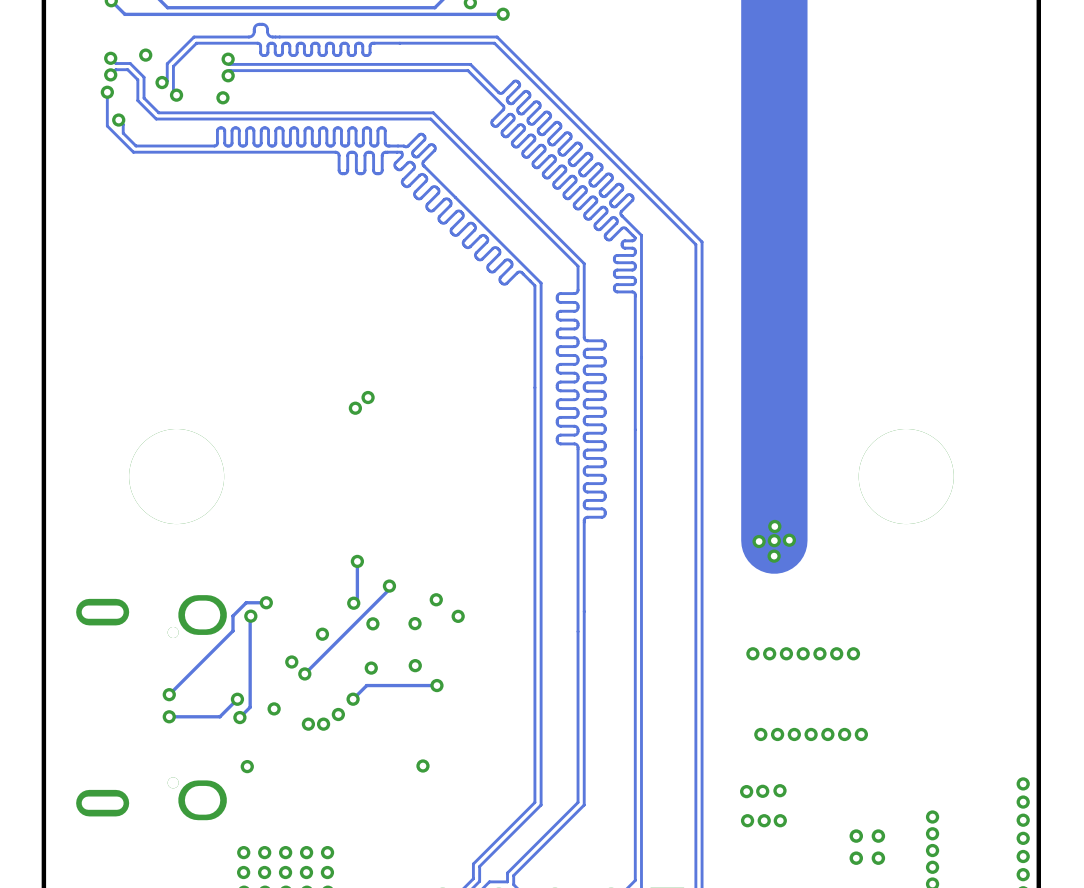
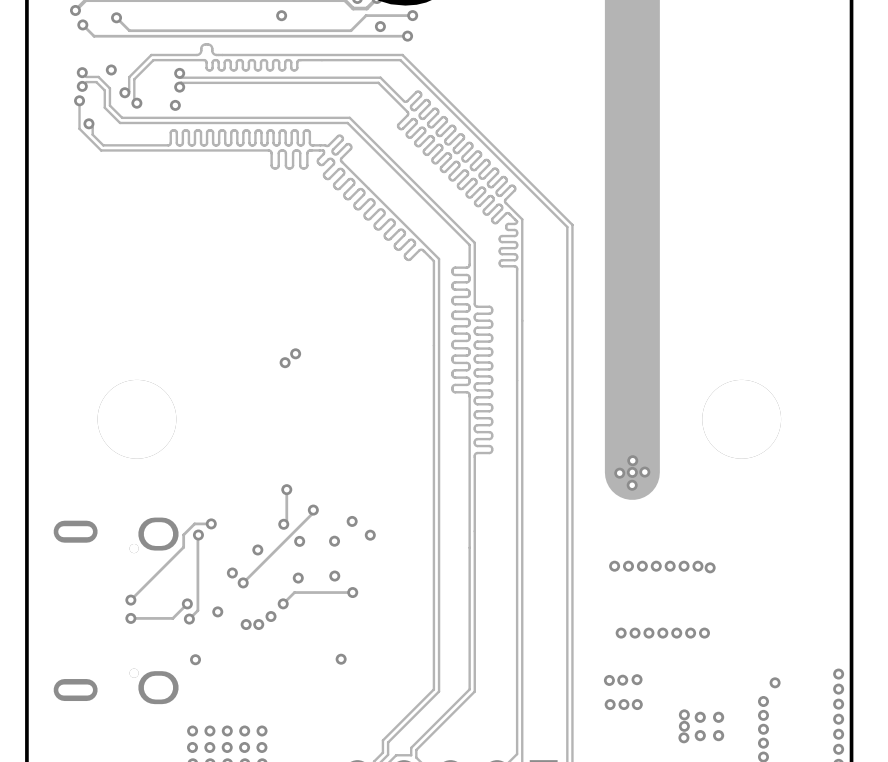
via: none -> (710, 567)
via: none -> (775, 682)
via: none -> (684, 714)
via: none -> (684, 726)
via: none -> (683, 737)

